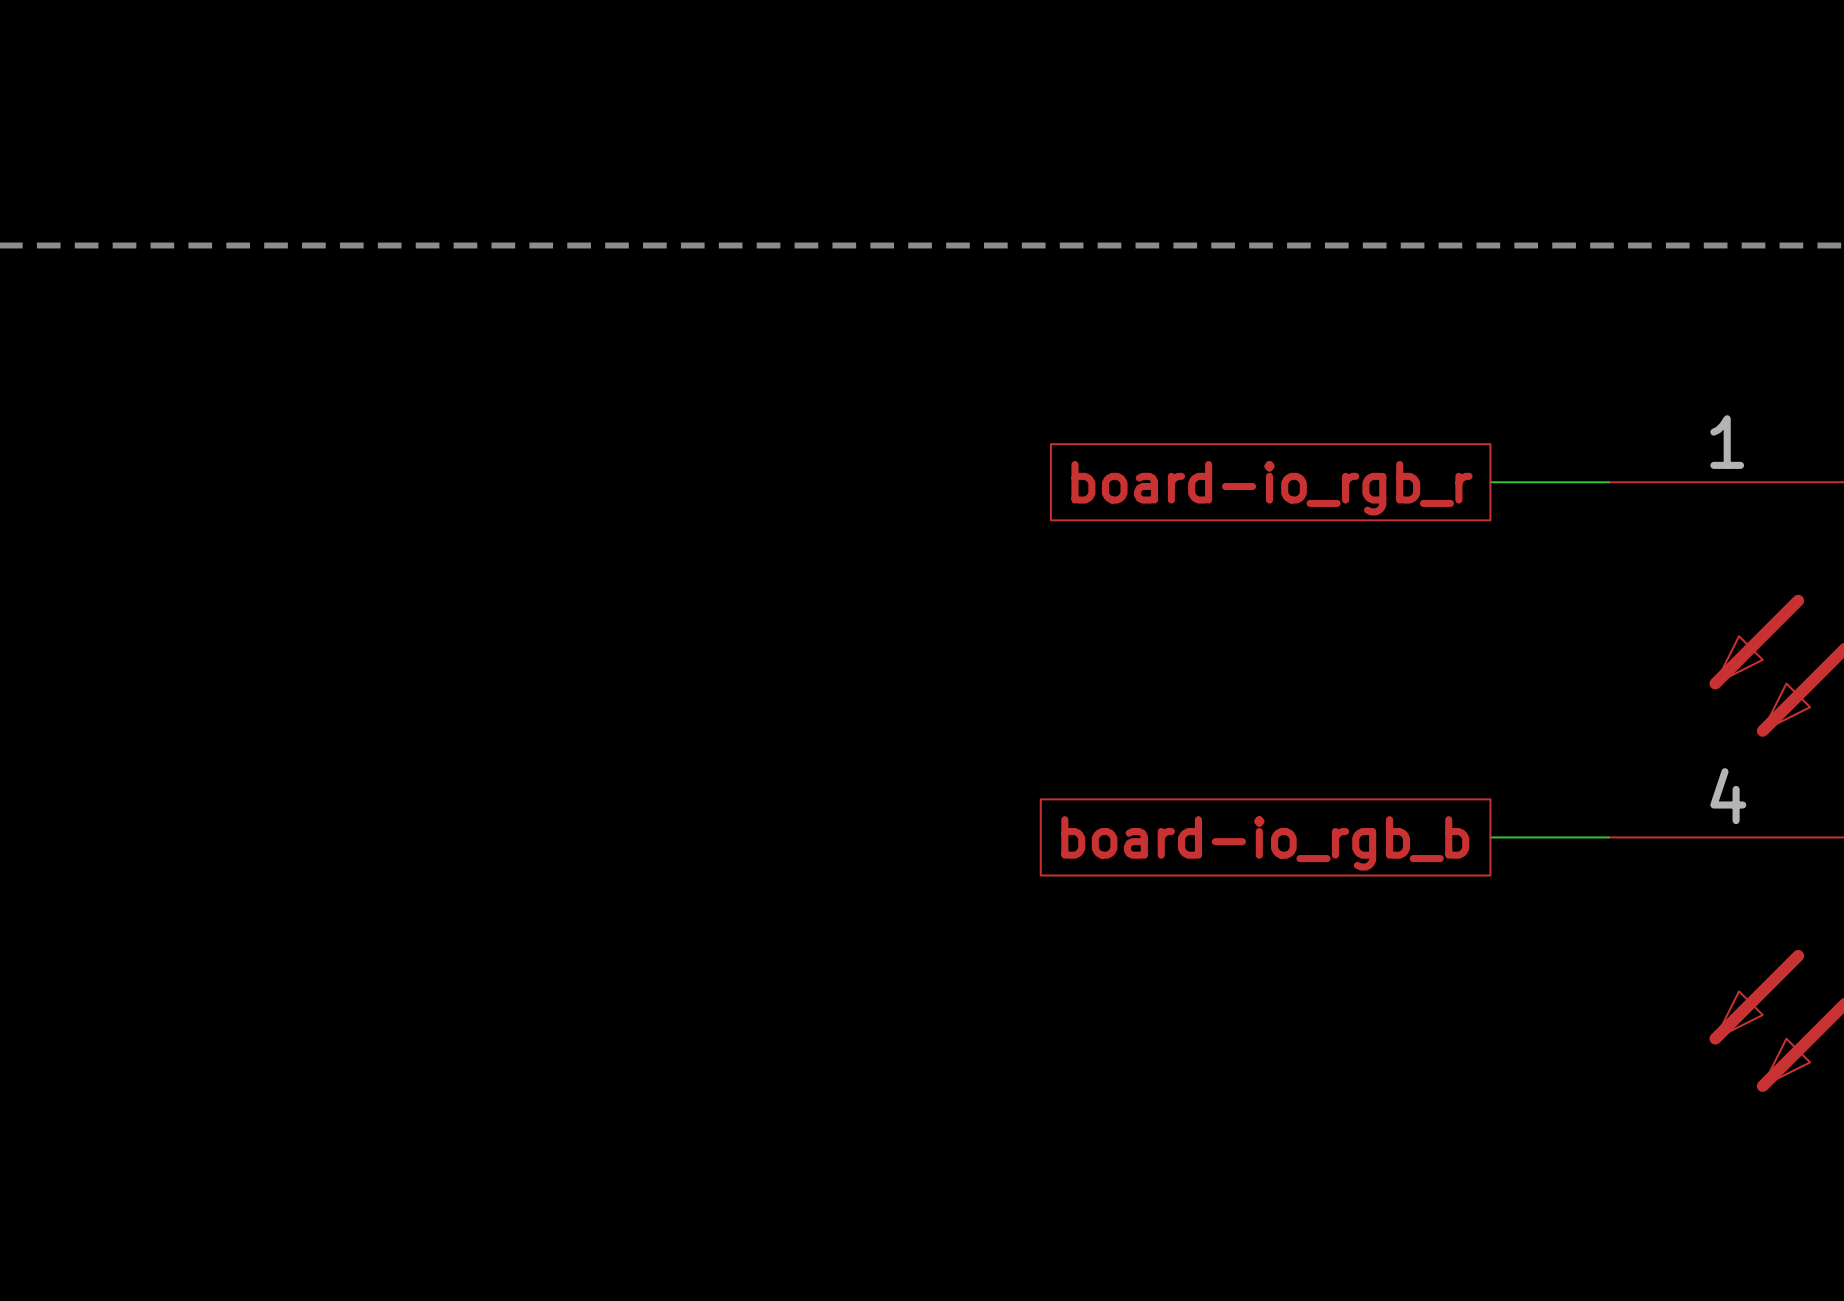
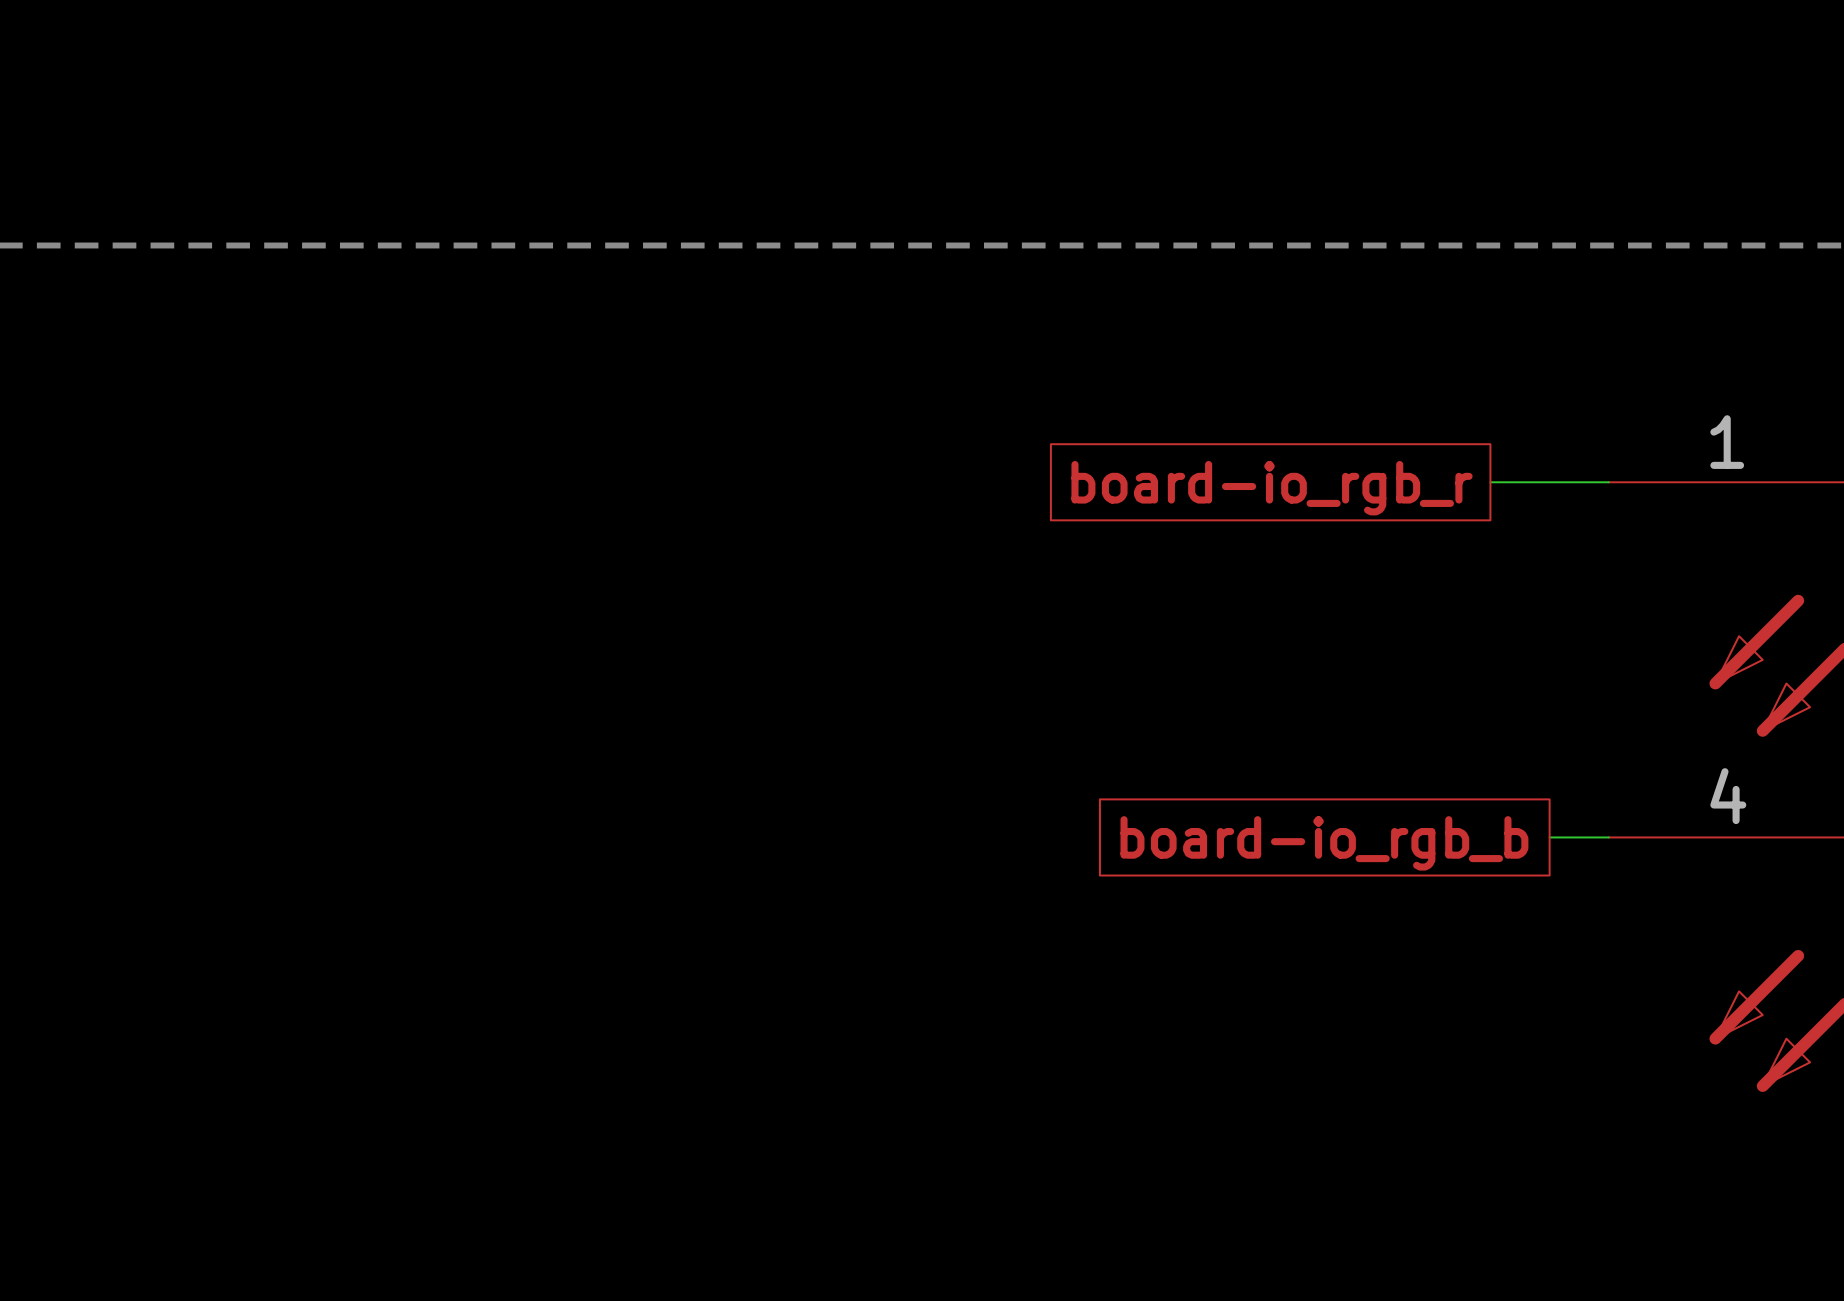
wire: (1490, 837) (1549, 837) -> none
global label position: board-io_rgb_b (1265, 843) -> board-io_rgb_b (1324, 843)

